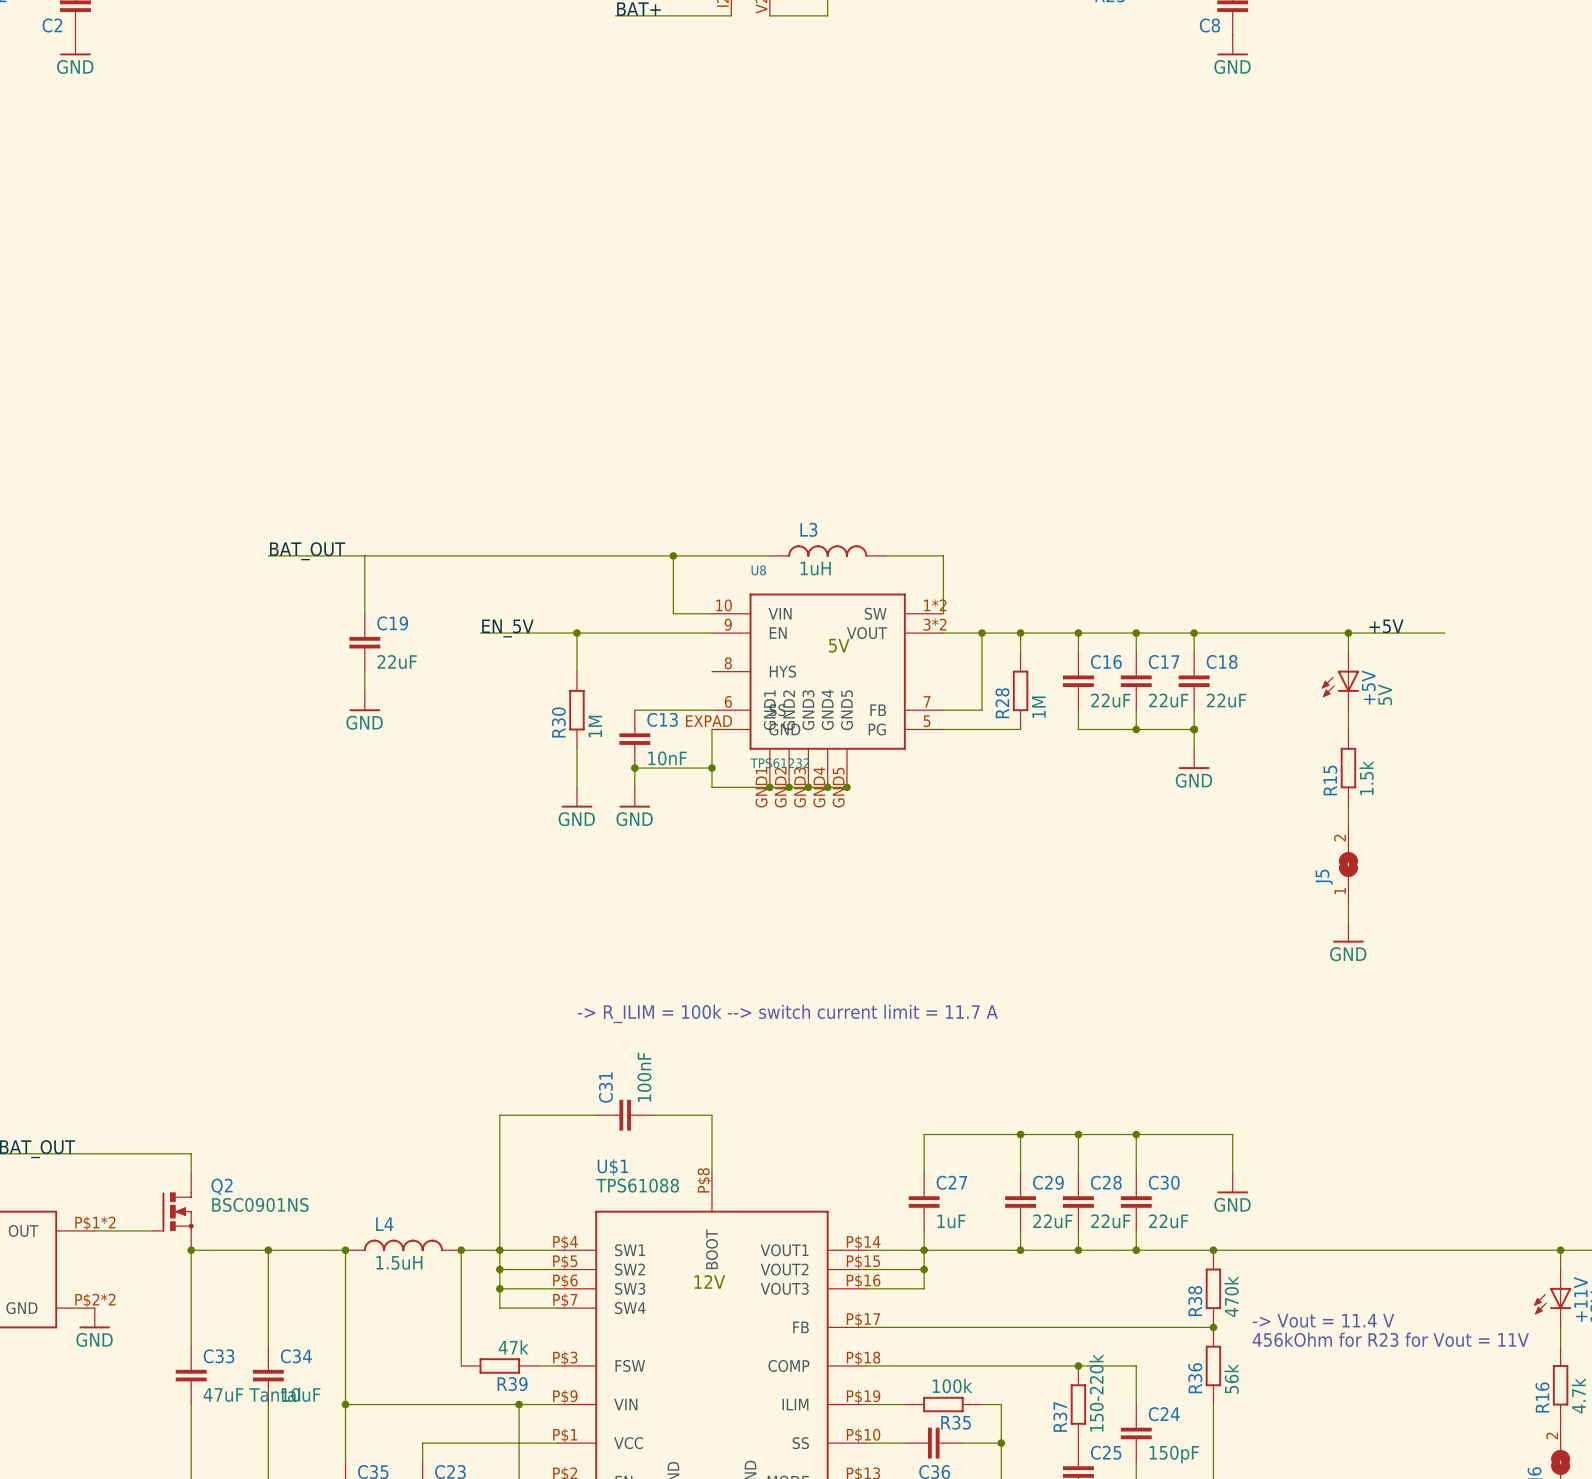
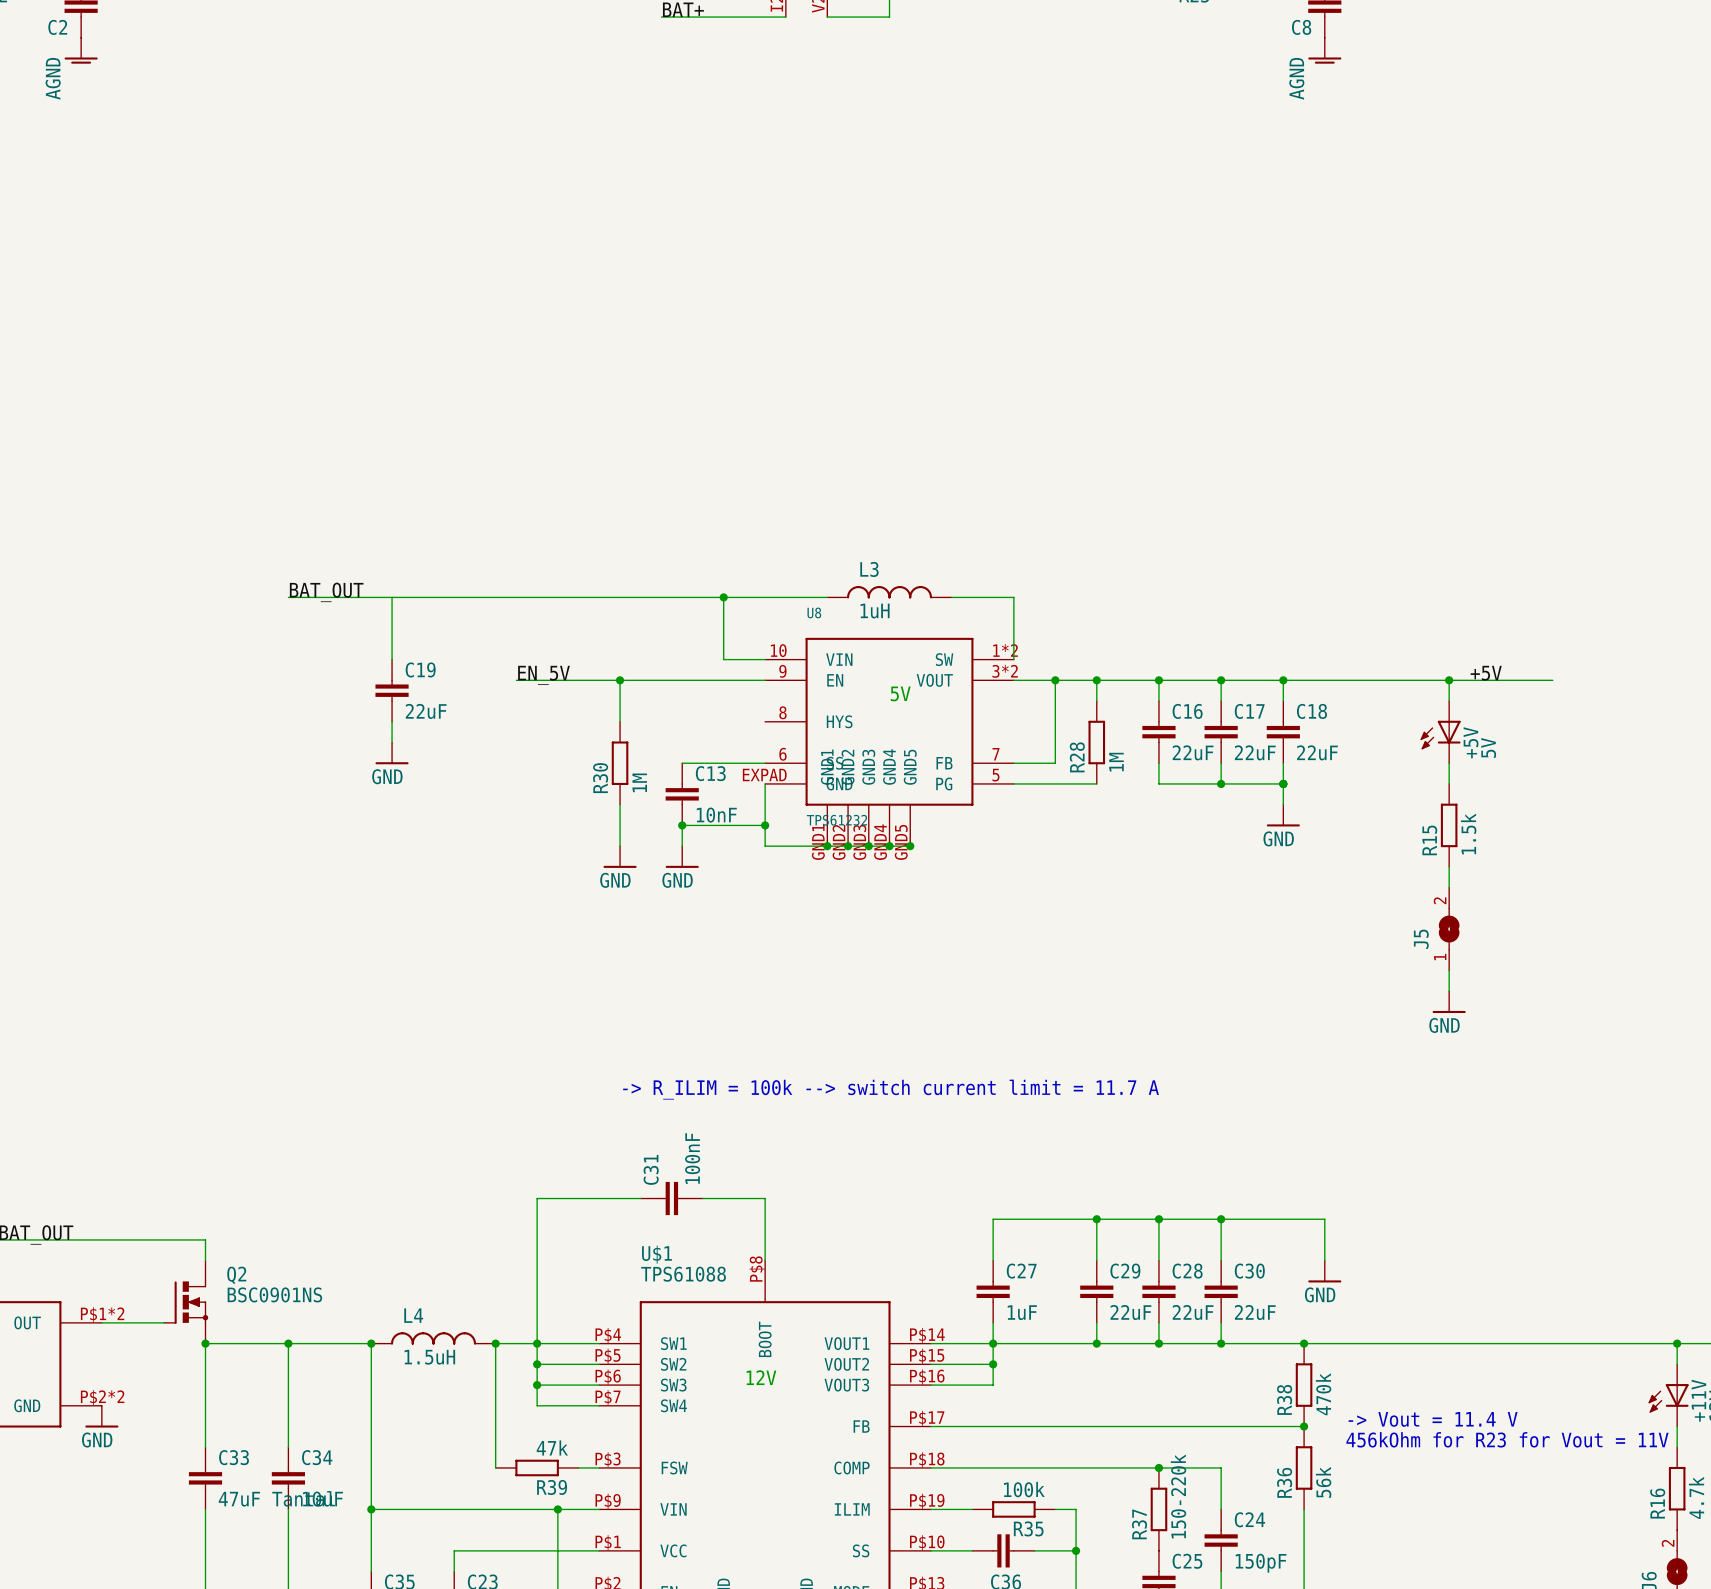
power symbol: GND (75, 45) -> AGND (81, 50)
power symbol: GND (1232, 45) -> AGND (1324, 50)

